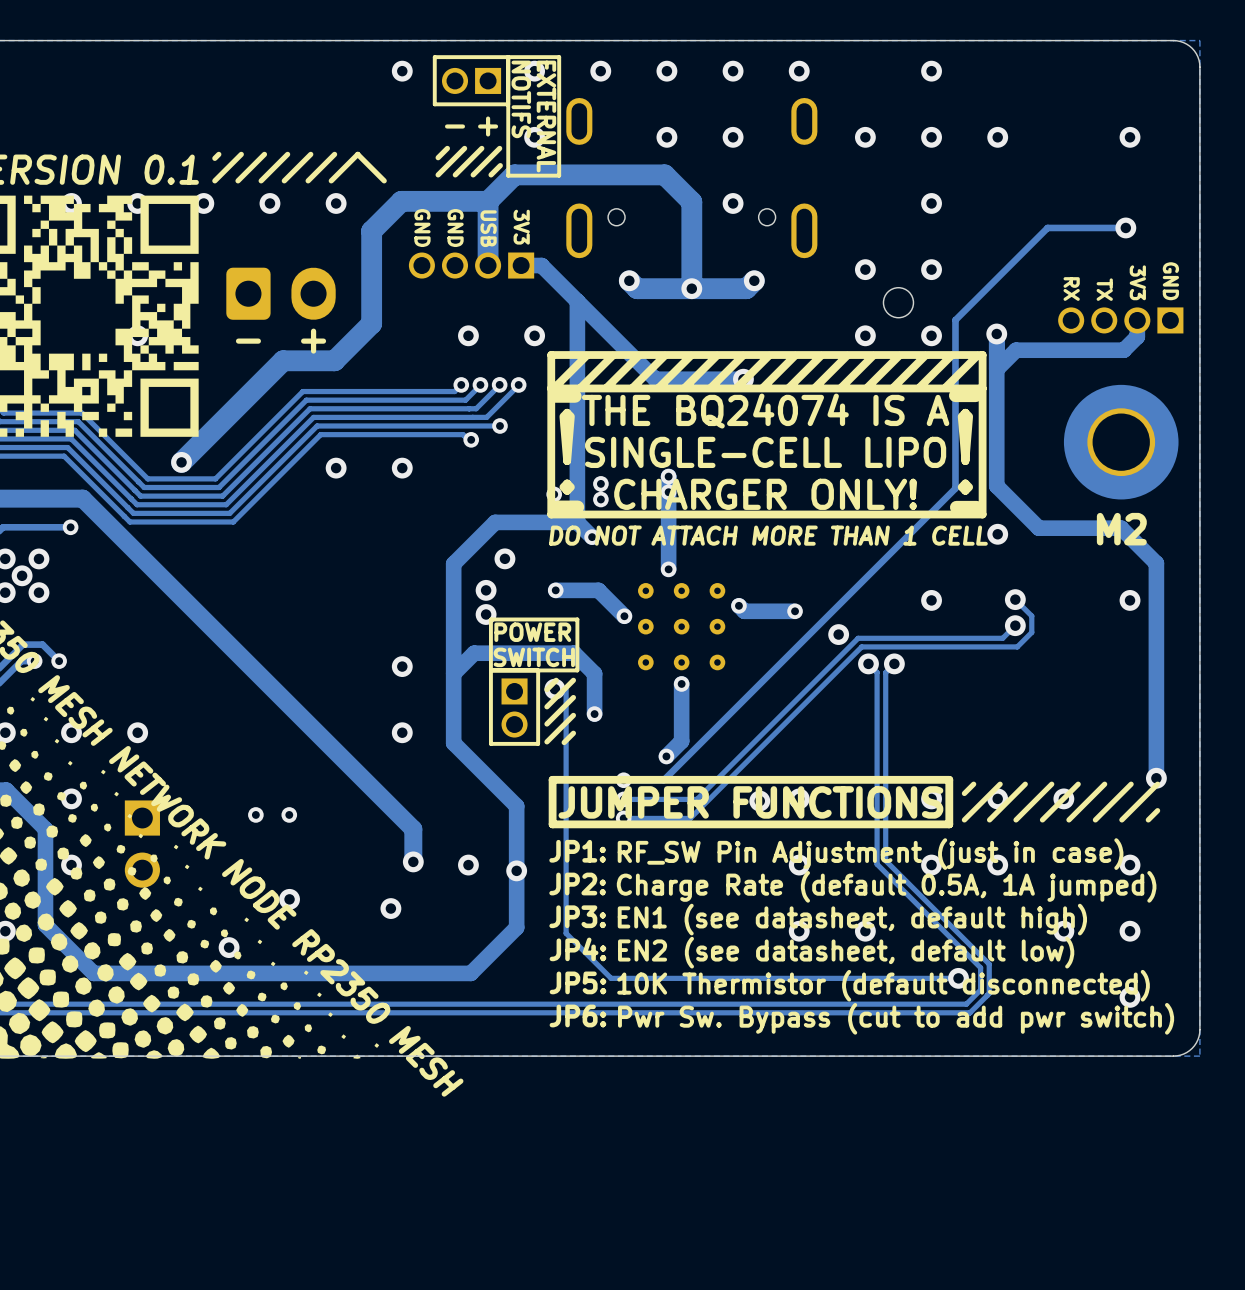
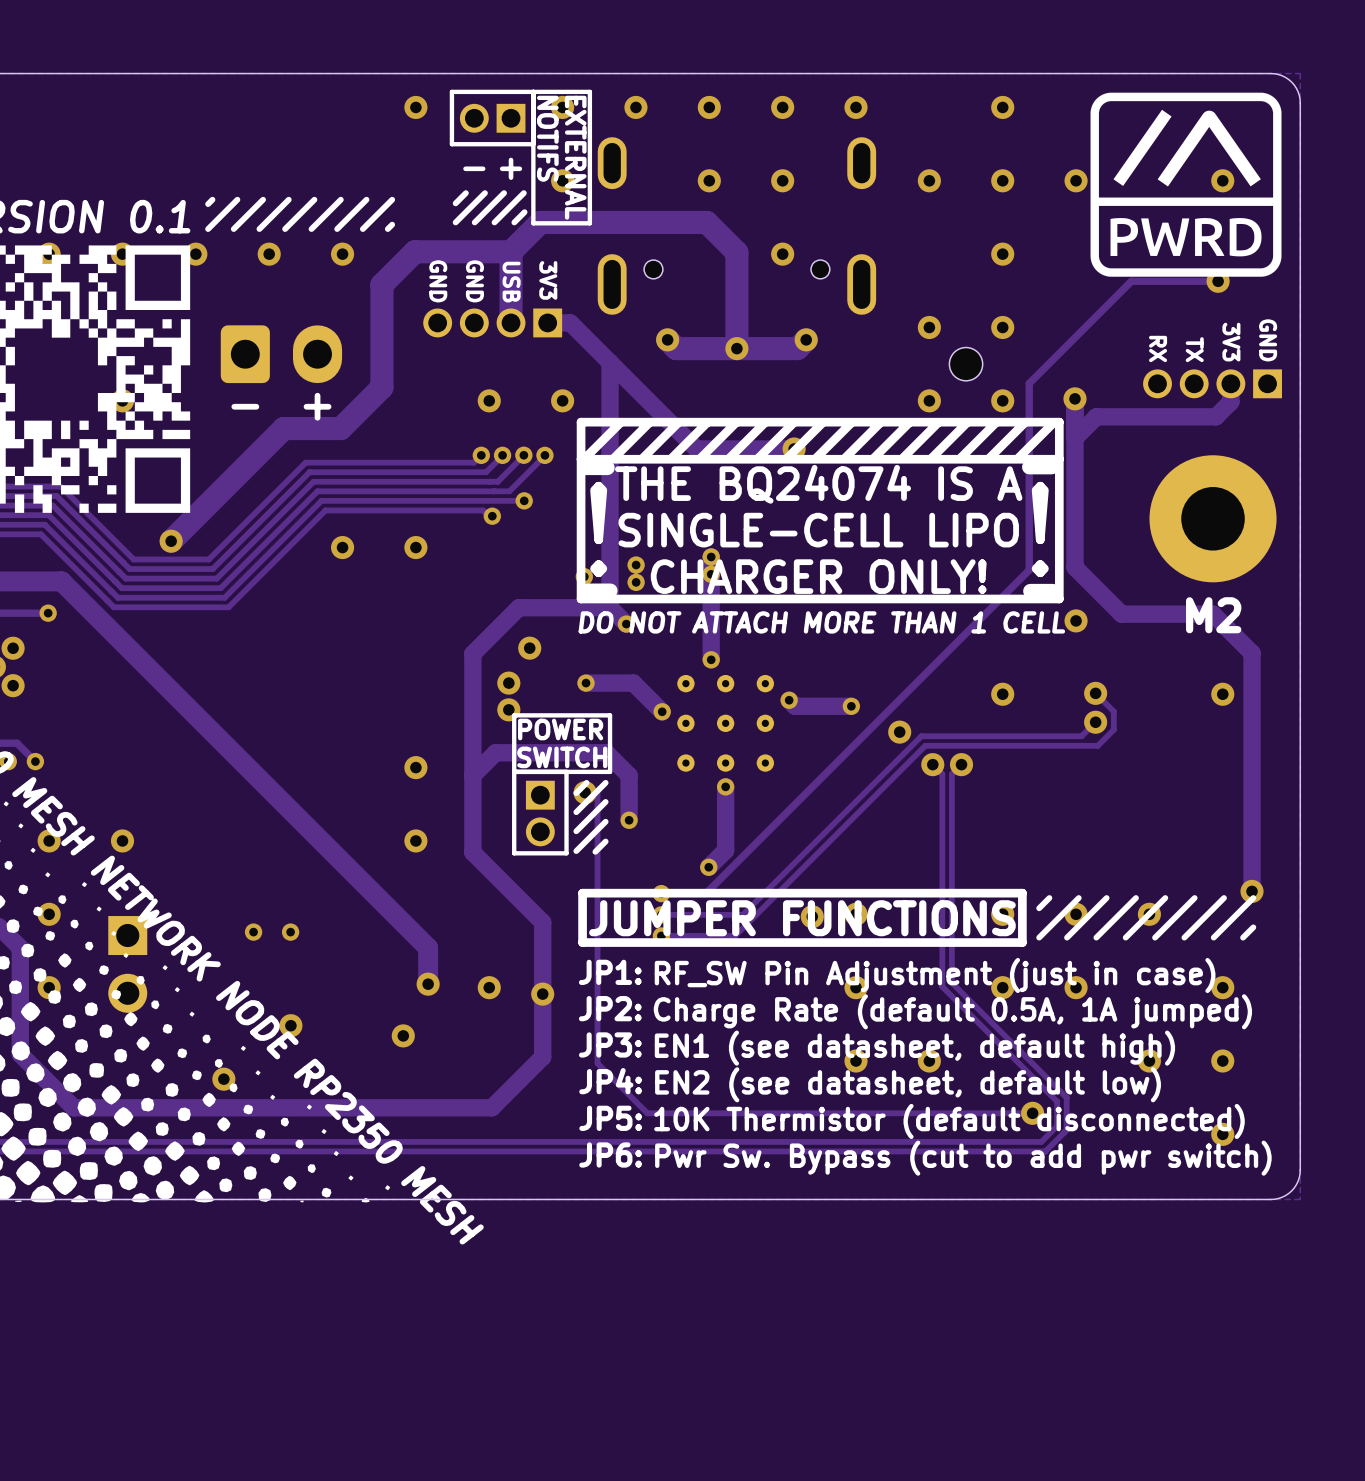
drawing: none -> [1090, 92, 1282, 277]
line: (357, 154) (384, 180) -> none
line: none -> (392, 199) (362, 229)
line: none -> (392, 224) (387, 229)

